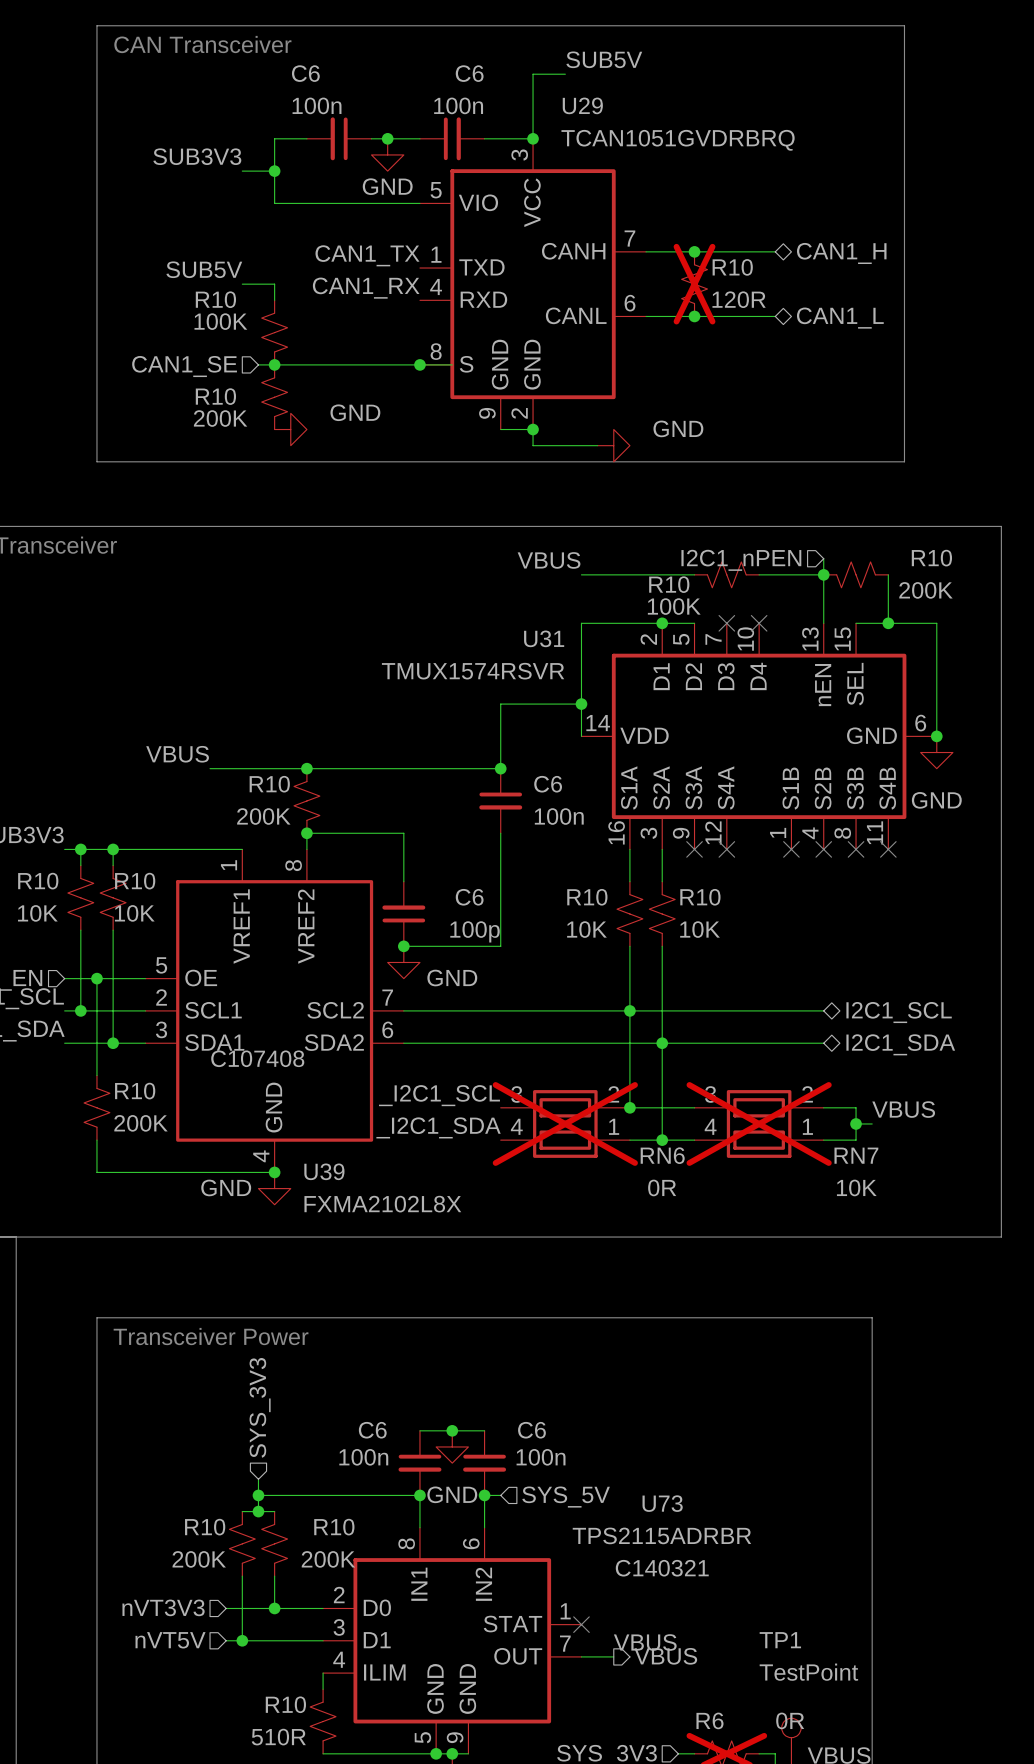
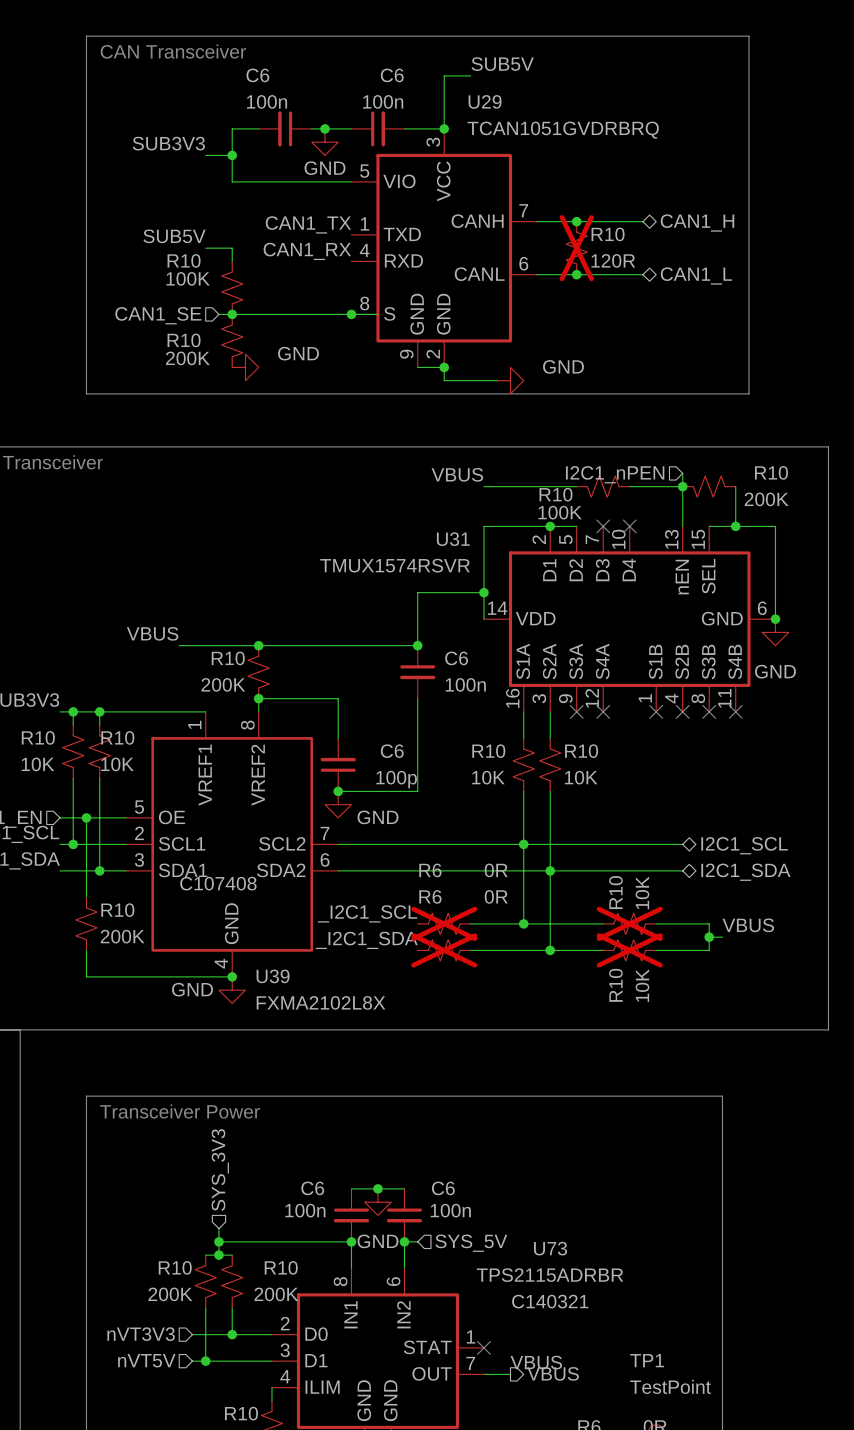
R6: none -> 0R (444, 923)
R10: none -> 10K (629, 923)
RN6: 0R (565, 1123) -> none
RN7: 10K (759, 1123) -> none
R6: none -> 0R (444, 950)
R10: none -> 10K (629, 950)

